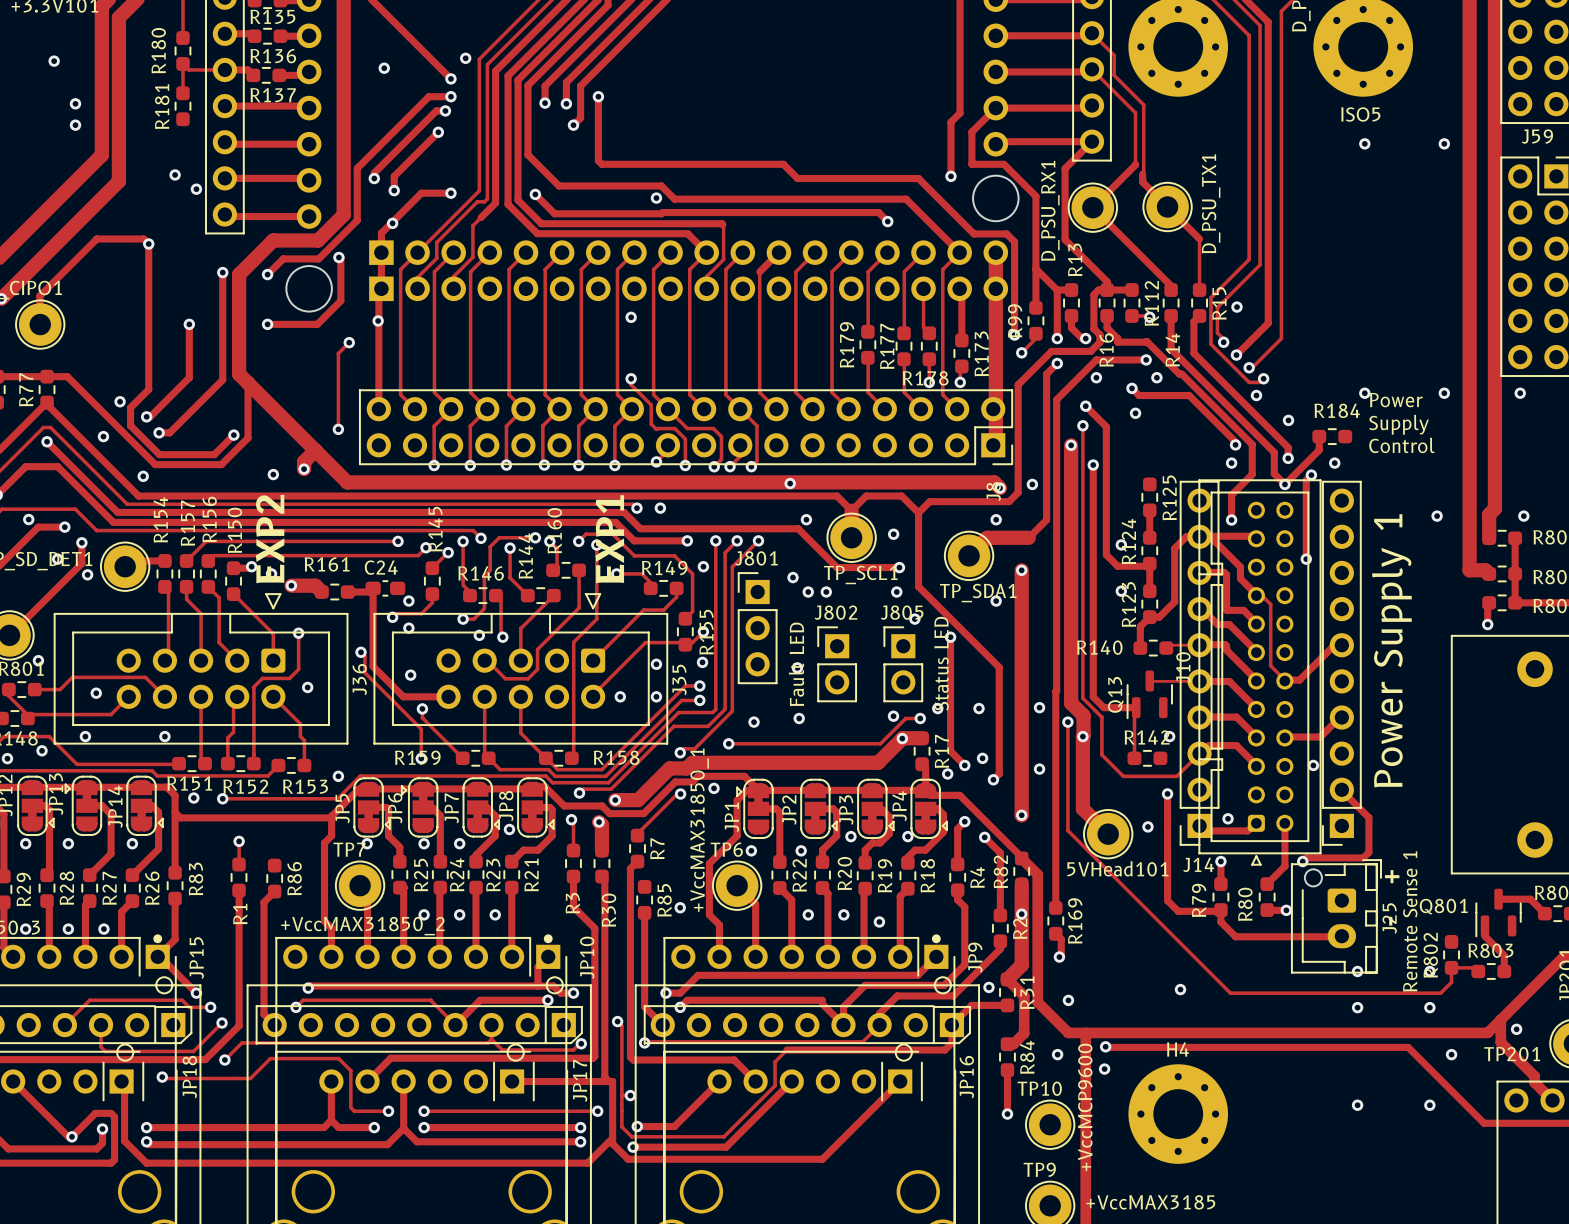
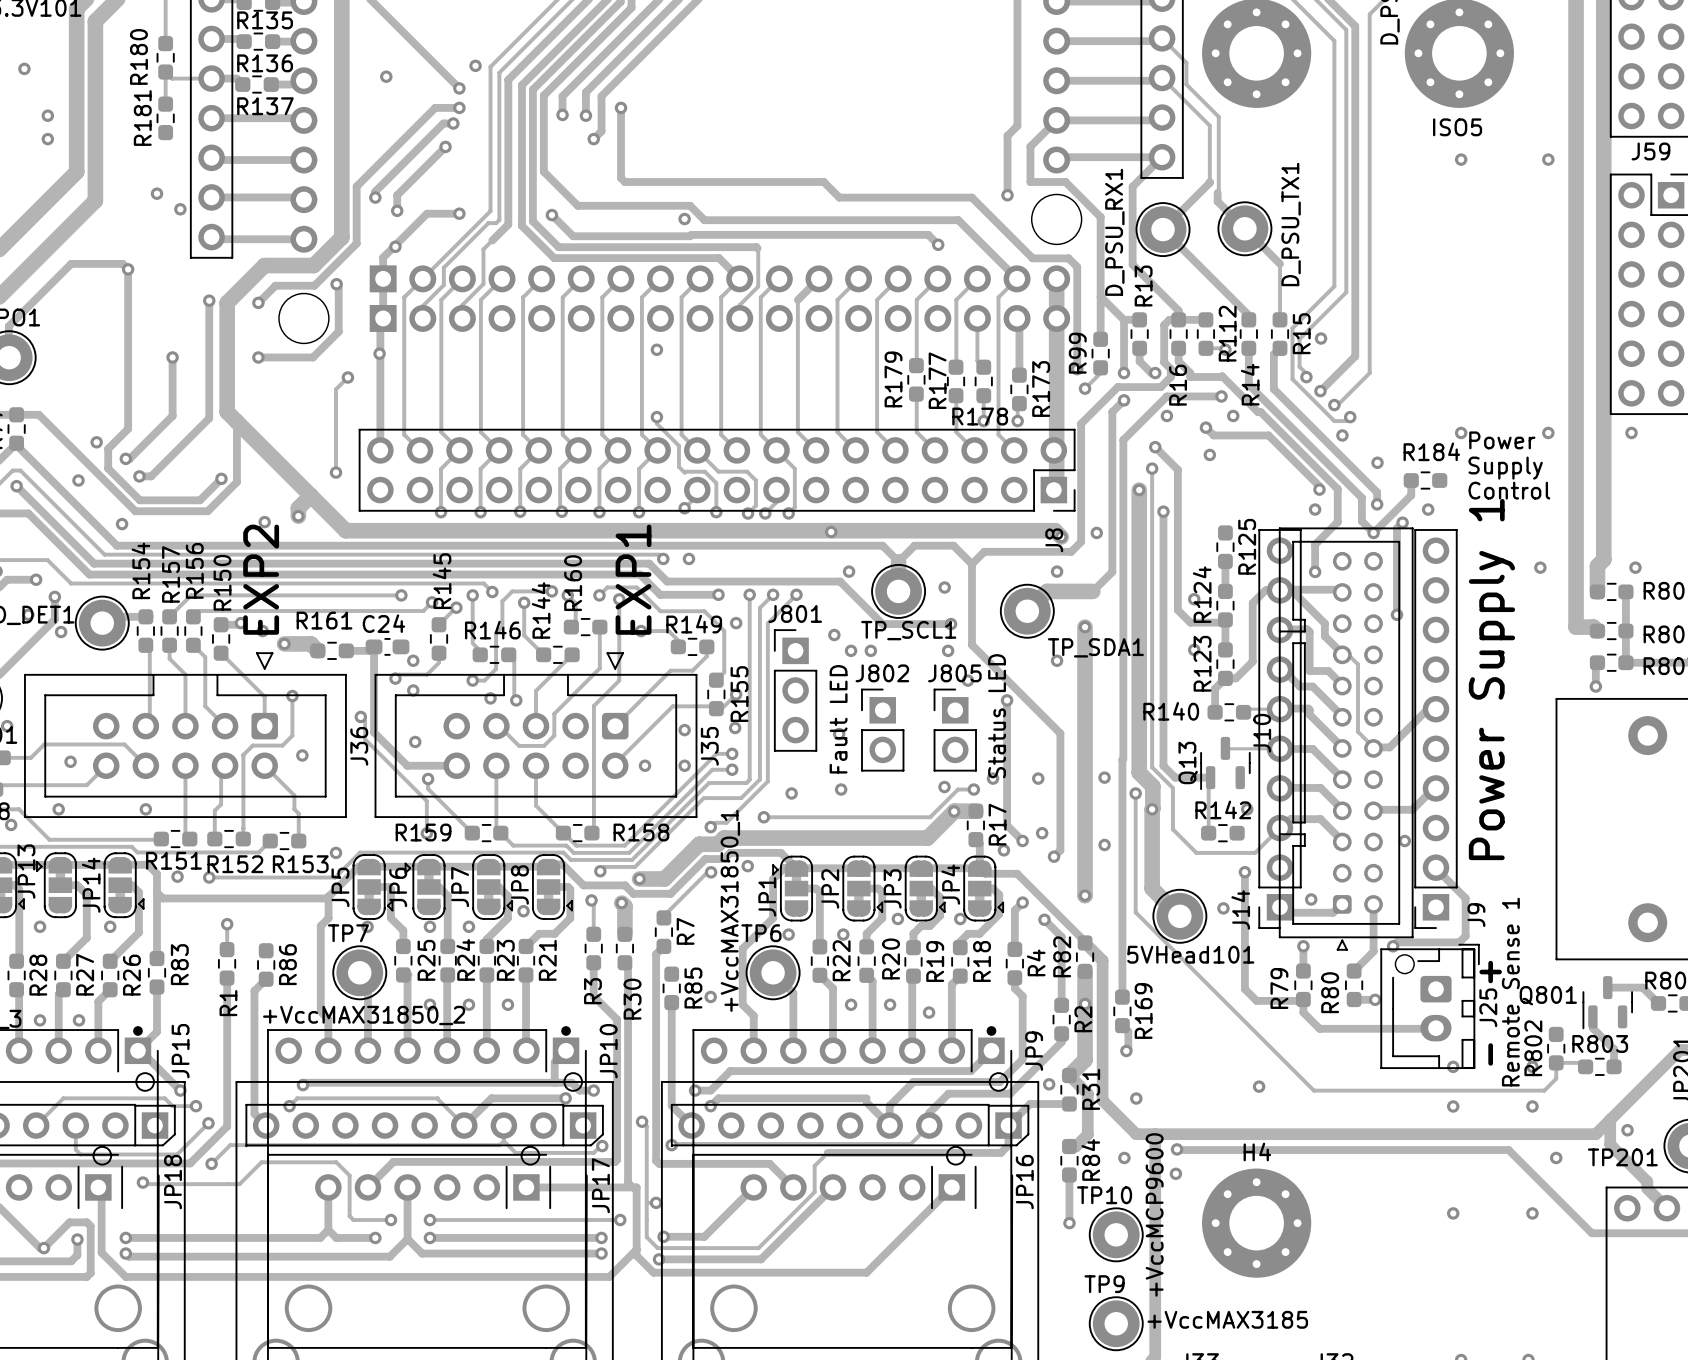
TP_SDA1 name position: TP_SDA1 (978, 593) -> TP_SDA1 (1095, 647)
J9 name: none -> J9 (1476, 915)
J14 name rotation: 0° (1198, 864) -> 90° counterclockwise (1240, 909)
J14 name position: J14 (1198, 864) -> J14 (1240, 909)

